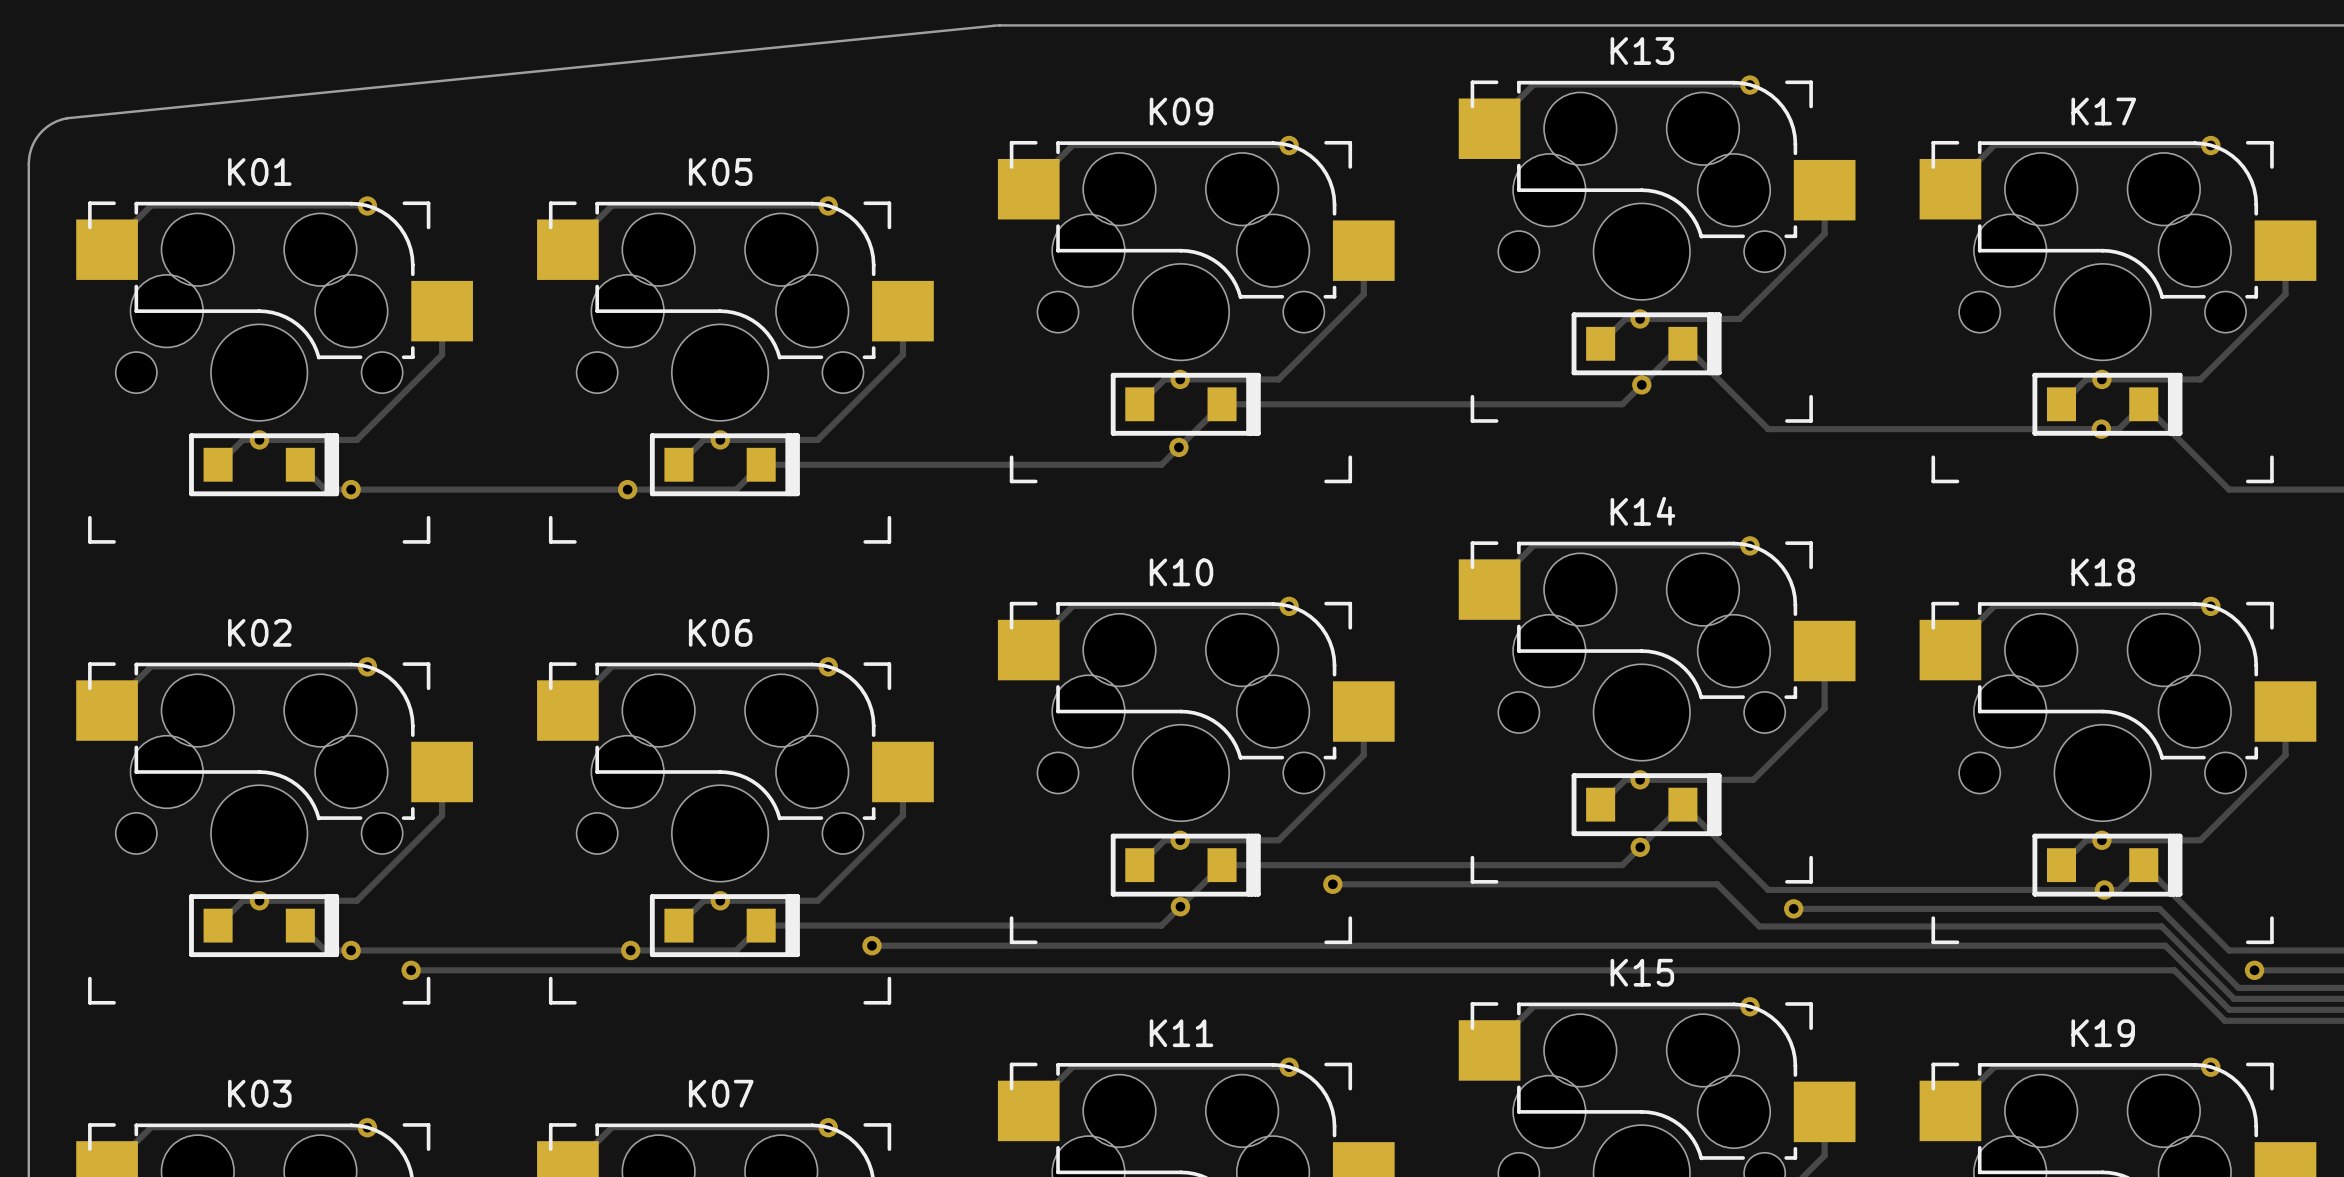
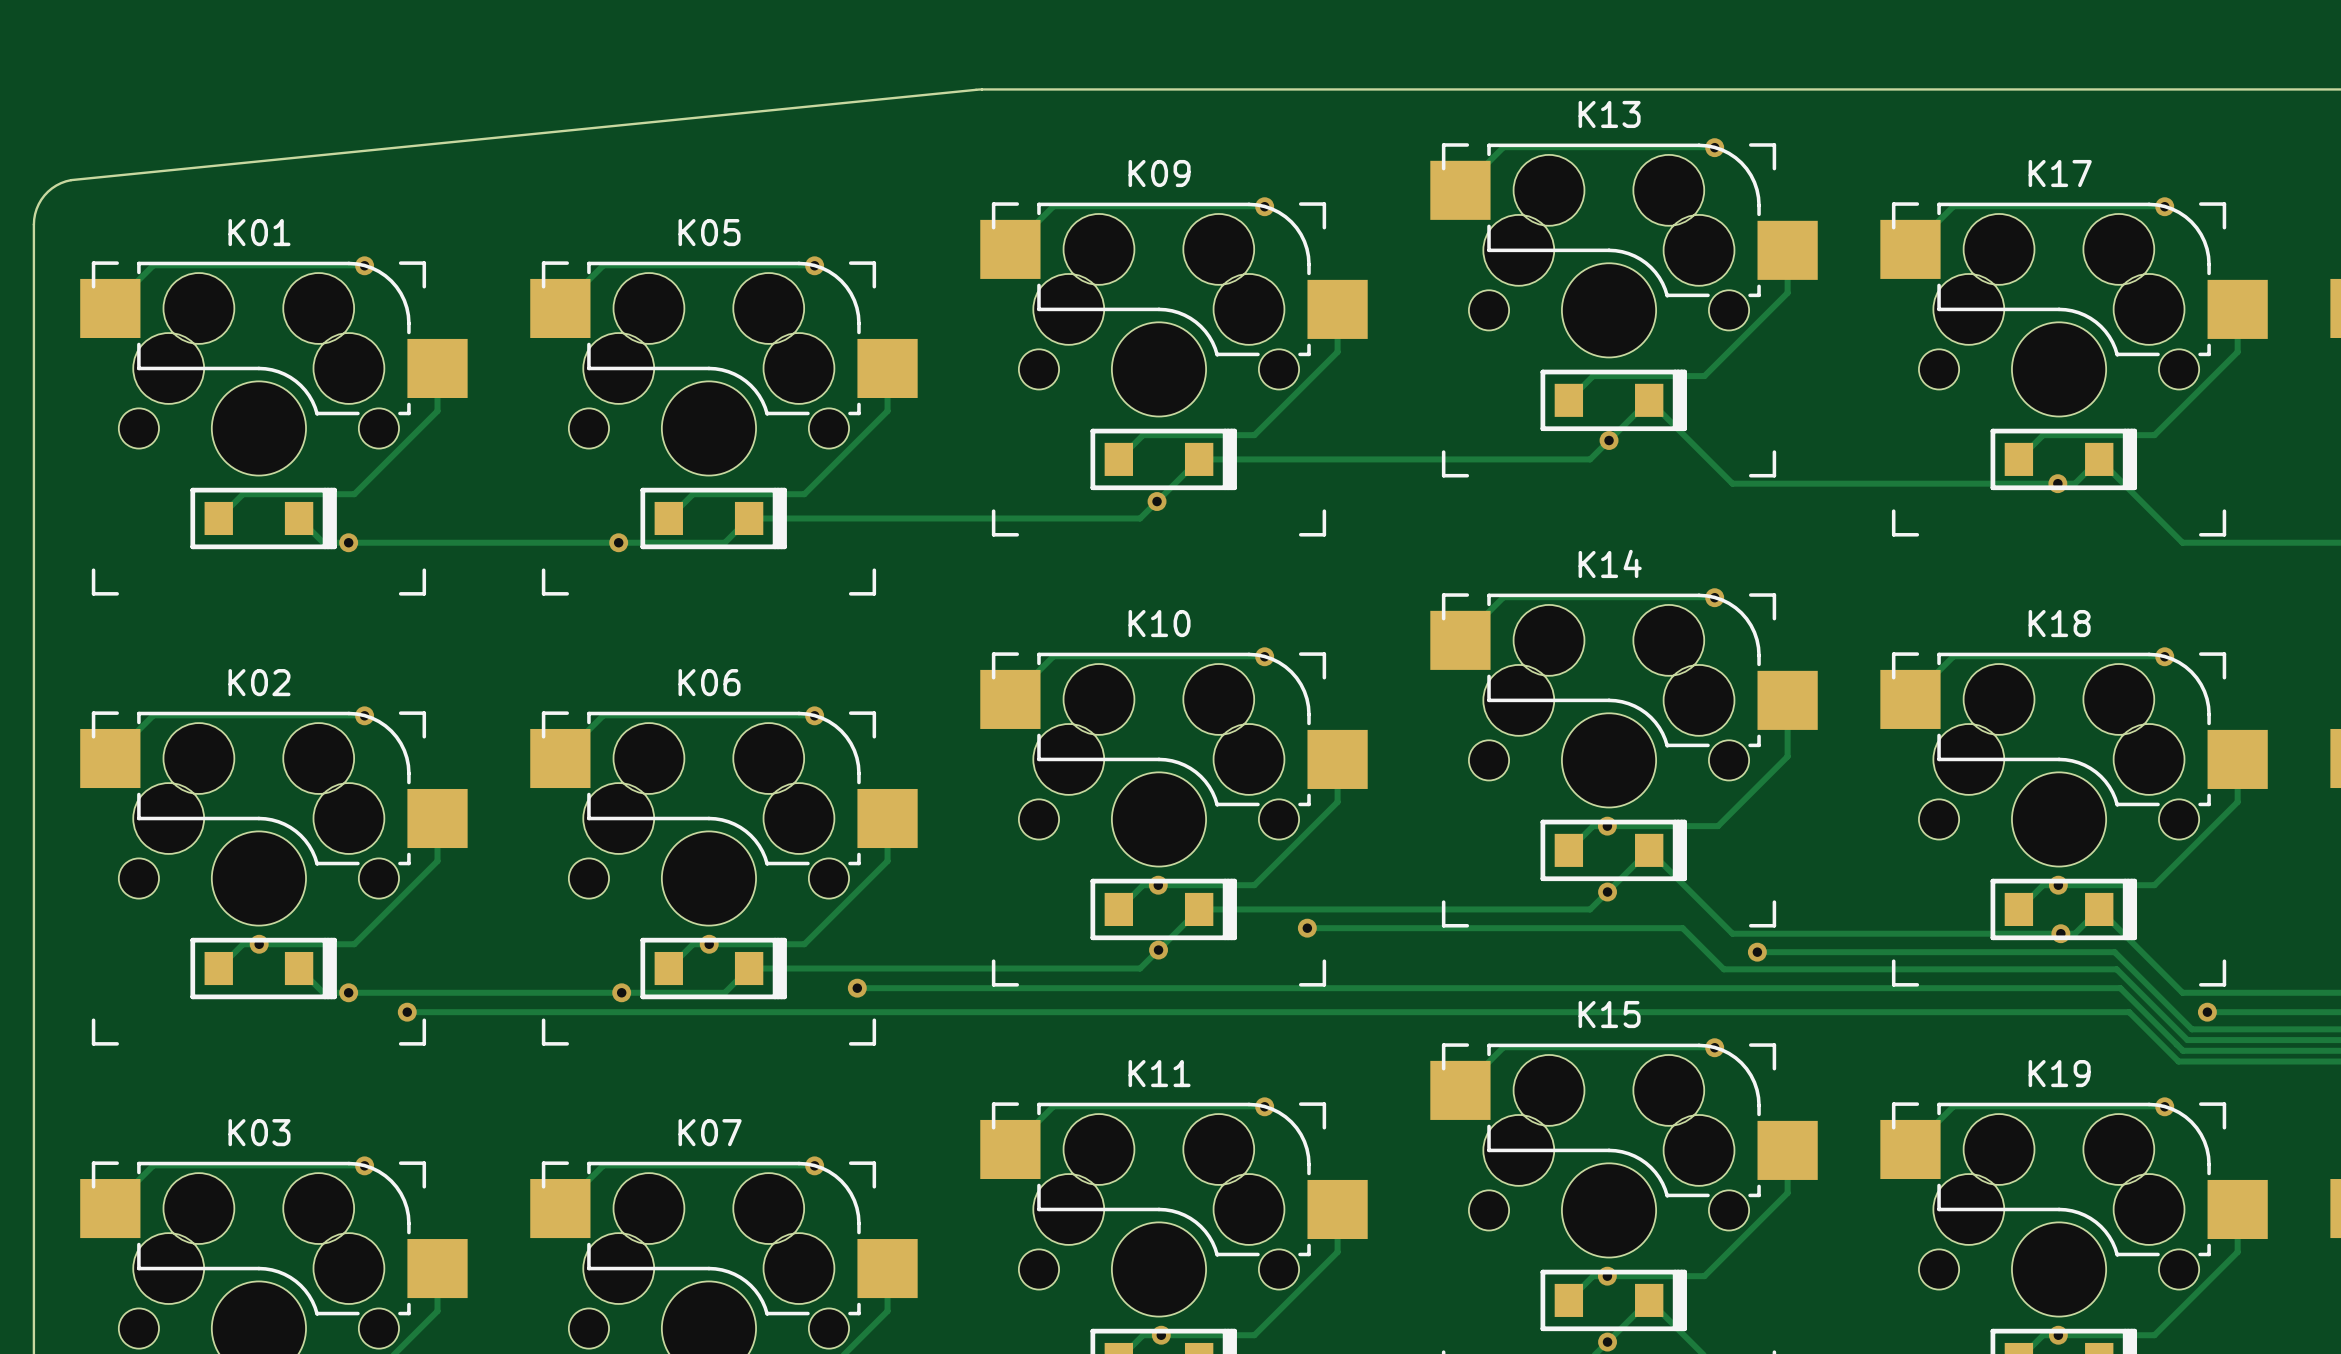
via: (1640, 318) -> none
via: (1180, 379) -> none
via: (2101, 379) -> none
via: (259, 439) -> none
via: (720, 439) -> none

